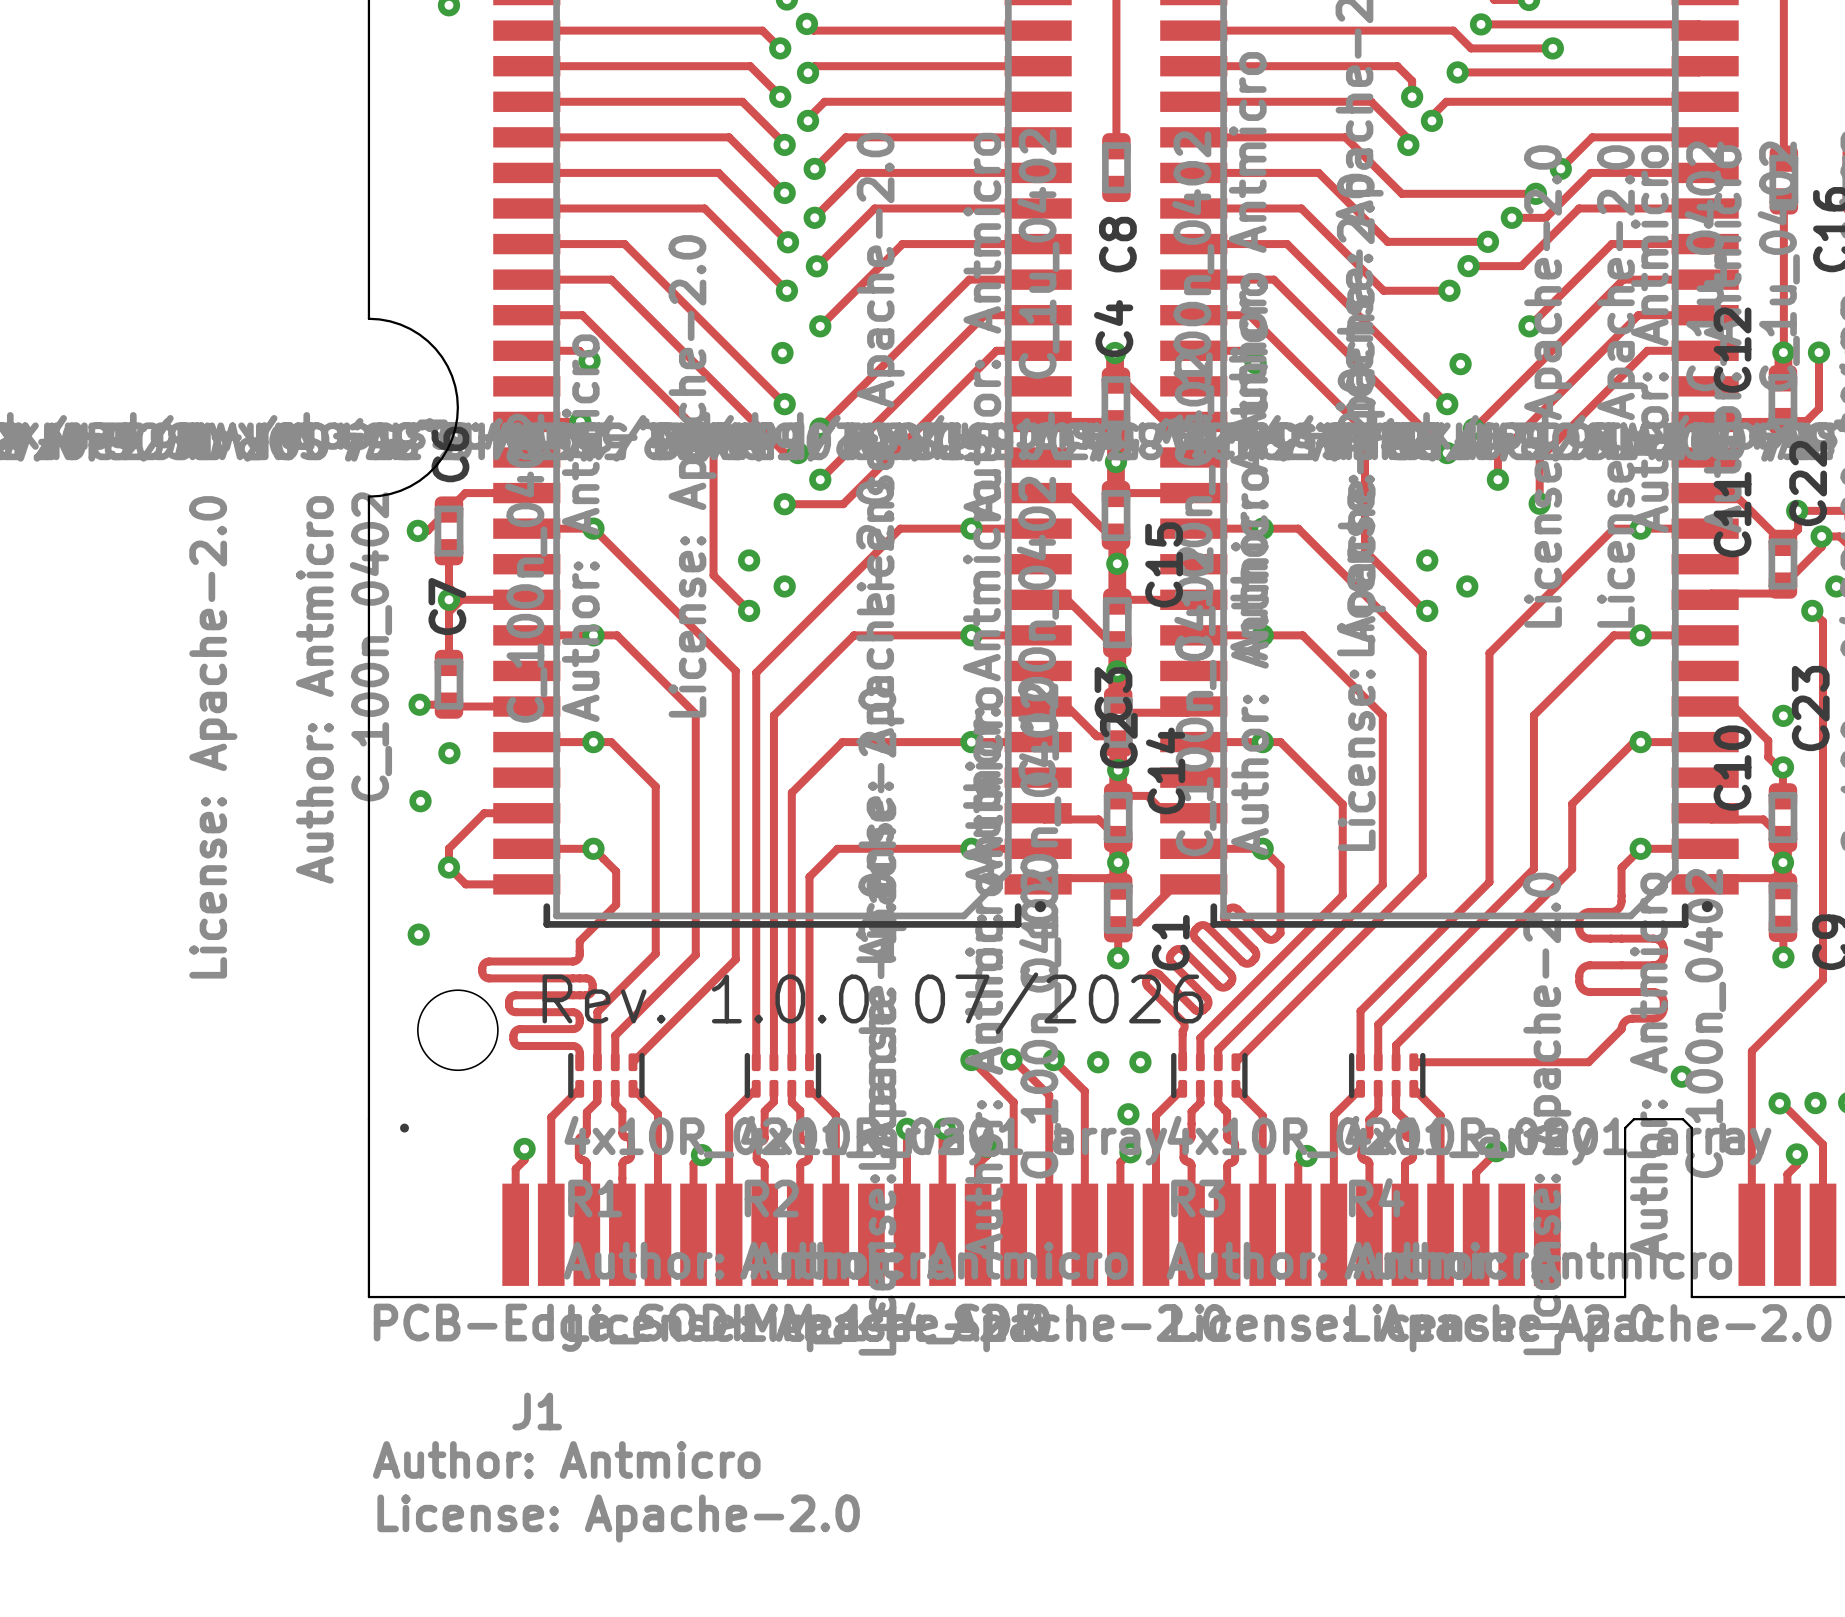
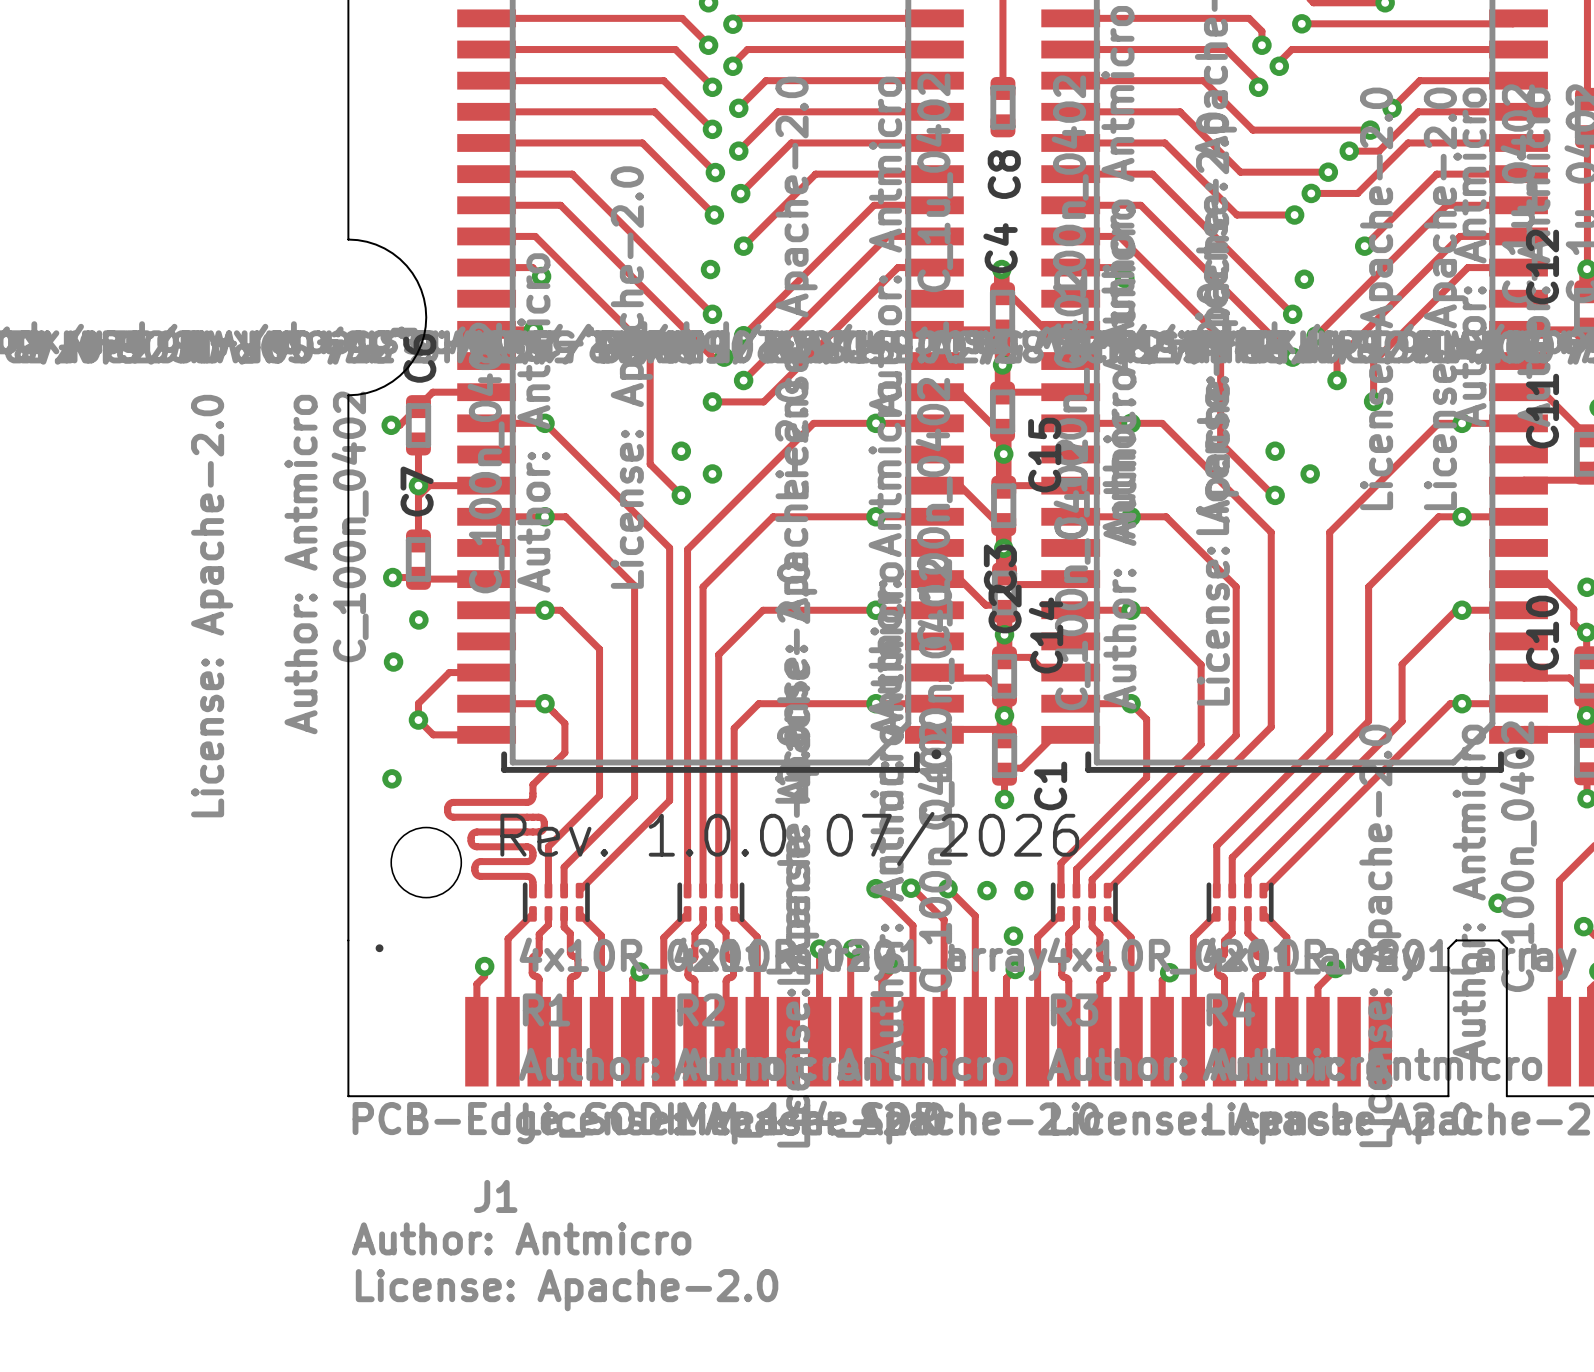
track: (1640, 848) (1621, 867) (1621, 902) (1619, 907) (1612, 911) (1584, 913) (1579, 920) (1579, 930) (1582, 935) (1588, 938) (1656, 939) (1663, 945) (1662, 959) (1654, 965) (1587, 965) (1580, 971) (1579, 982) (1582, 988) (1588, 991) (1656, 992) (1663, 1000) (1663, 1010) (1660, 1015) (1654, 1018) (1626, 1020) (1621, 1029) (1588, 1062) (1413, 1062) -> (1462, 703) (1450, 703) (1263, 890)
track: (1275, 937) (1271, 939) (1266, 938) (1235, 908) (1230, 907) (1225, 911) (1224, 919) (1254, 950) (1256, 955) (1254, 959) -> (1142, 781) (1123, 800)
track: (1251, 961) (1247, 963) (1242, 962) (1206, 926) (1200, 925) (1195, 929) (1193, 933) (1195, 938) (1231, 974) (1230, 983) -> (1121, 802) (1102, 821)
track: (1228, 985) (1224, 987) (1219, 986) (1182, 950) (1176, 949) (1171, 953) (1170, 961) (1207, 998) (1208, 1003) (1206, 1007) -> (1100, 823) (1081, 842)
track: (1204, 1009) (1200, 1011) (1195, 1010) (1158, 973) (1152, 973) (1147, 977) (1146, 985) (1183, 1022) (1184, 1027) (1182, 1031) -> (1079, 844) (1060, 863)

